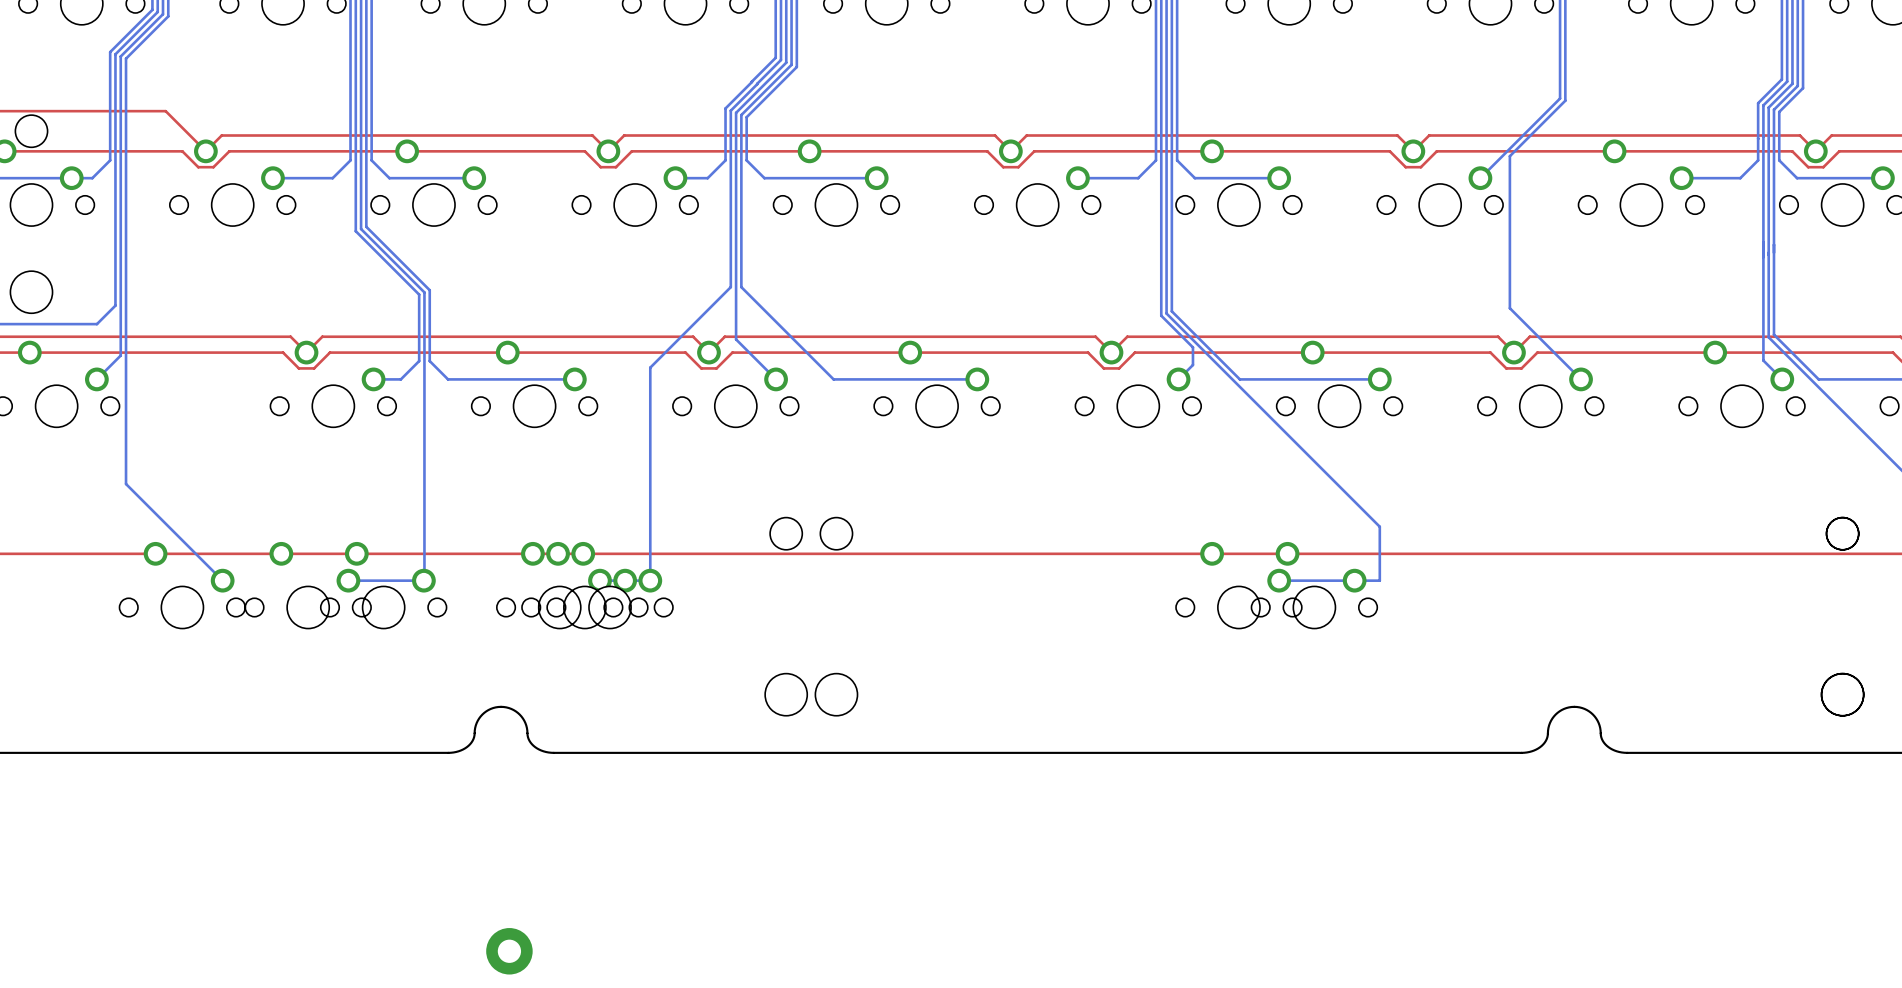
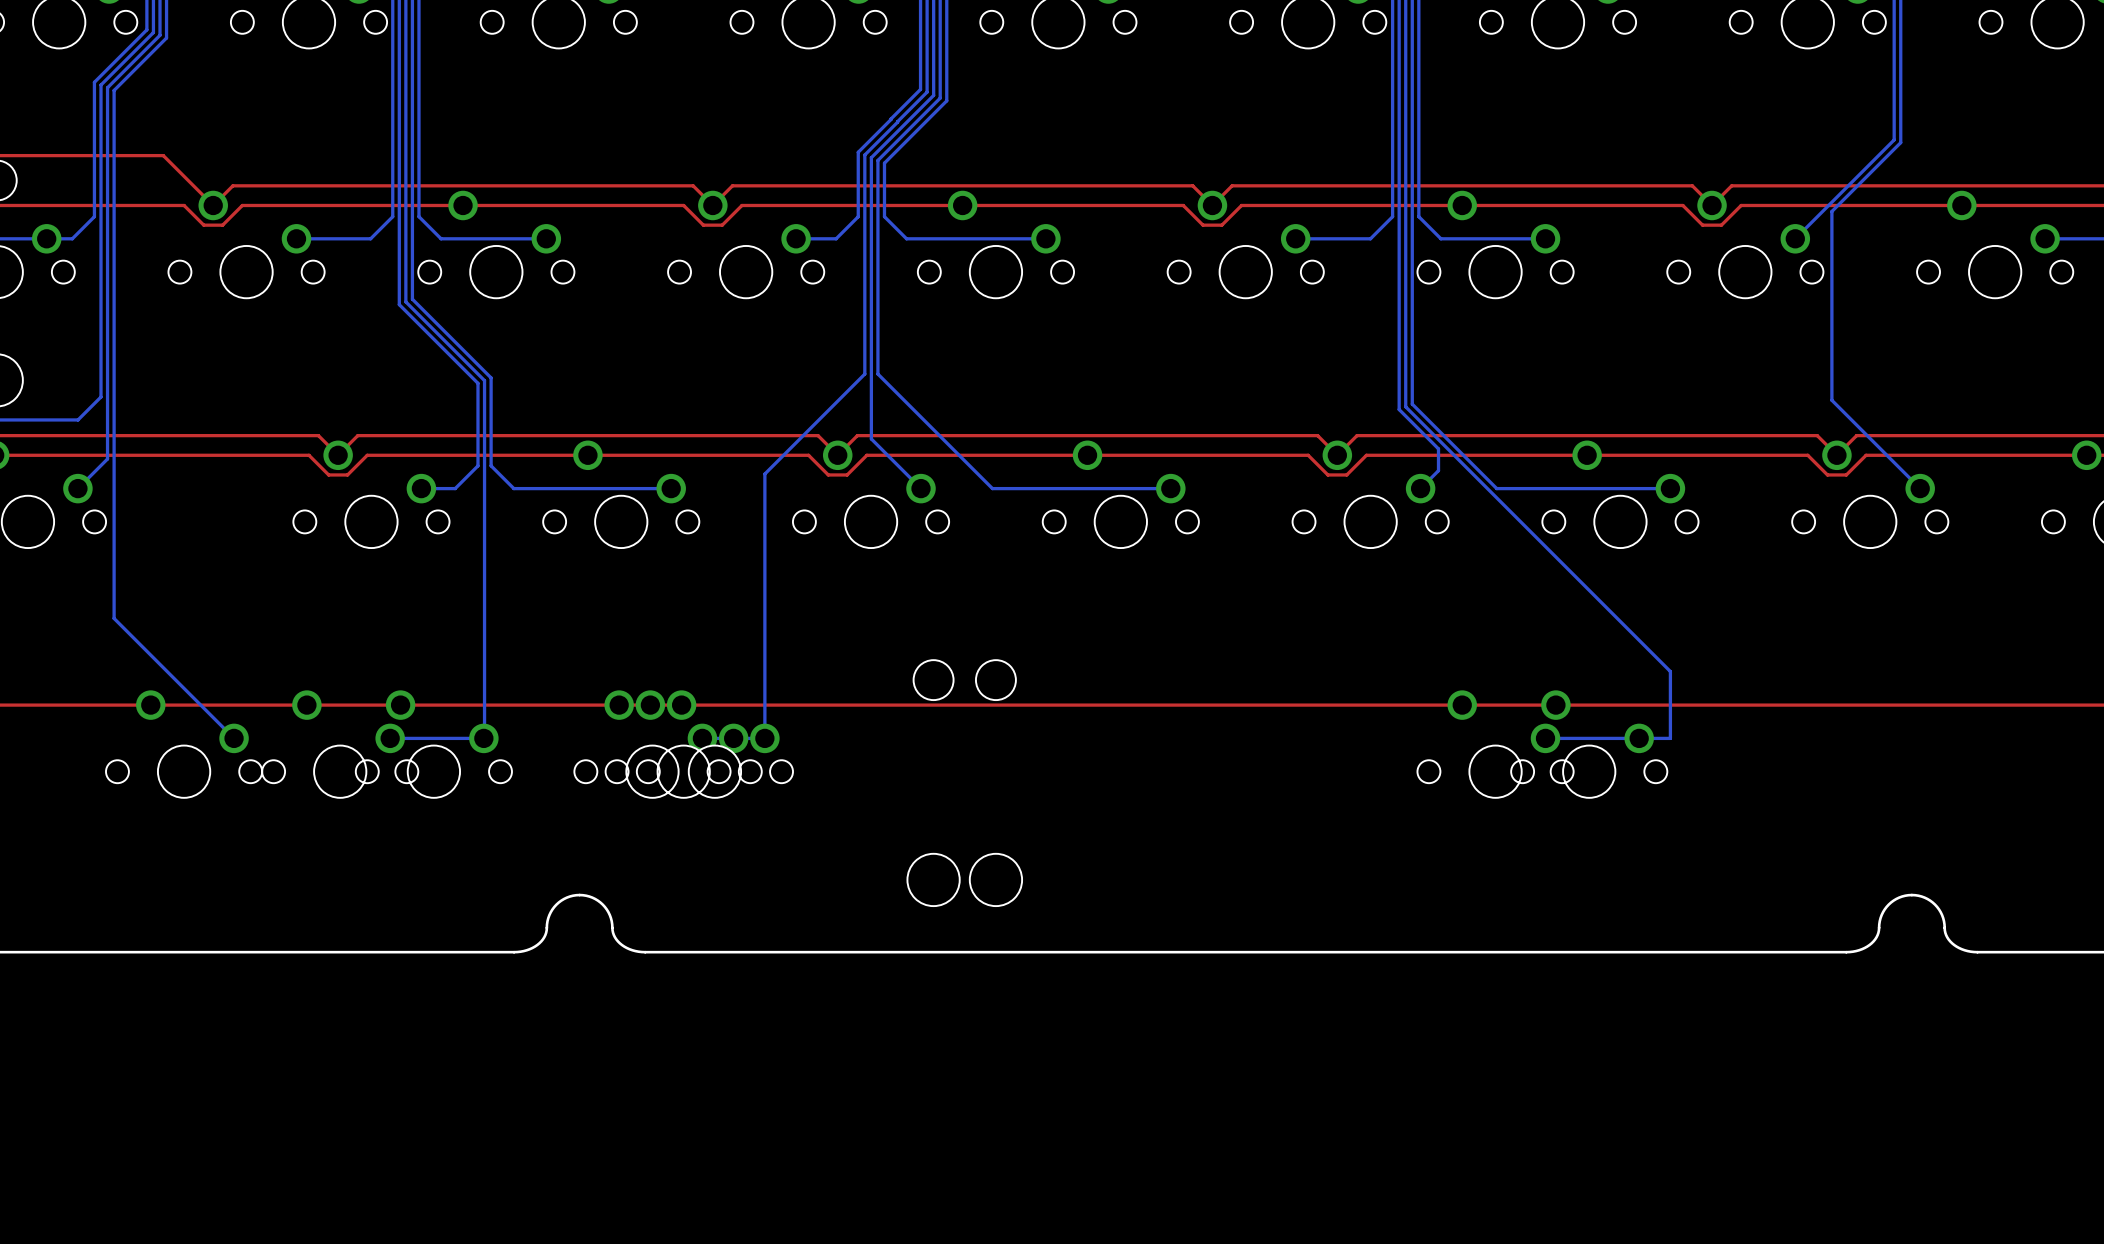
part: (509, 951) -> none

